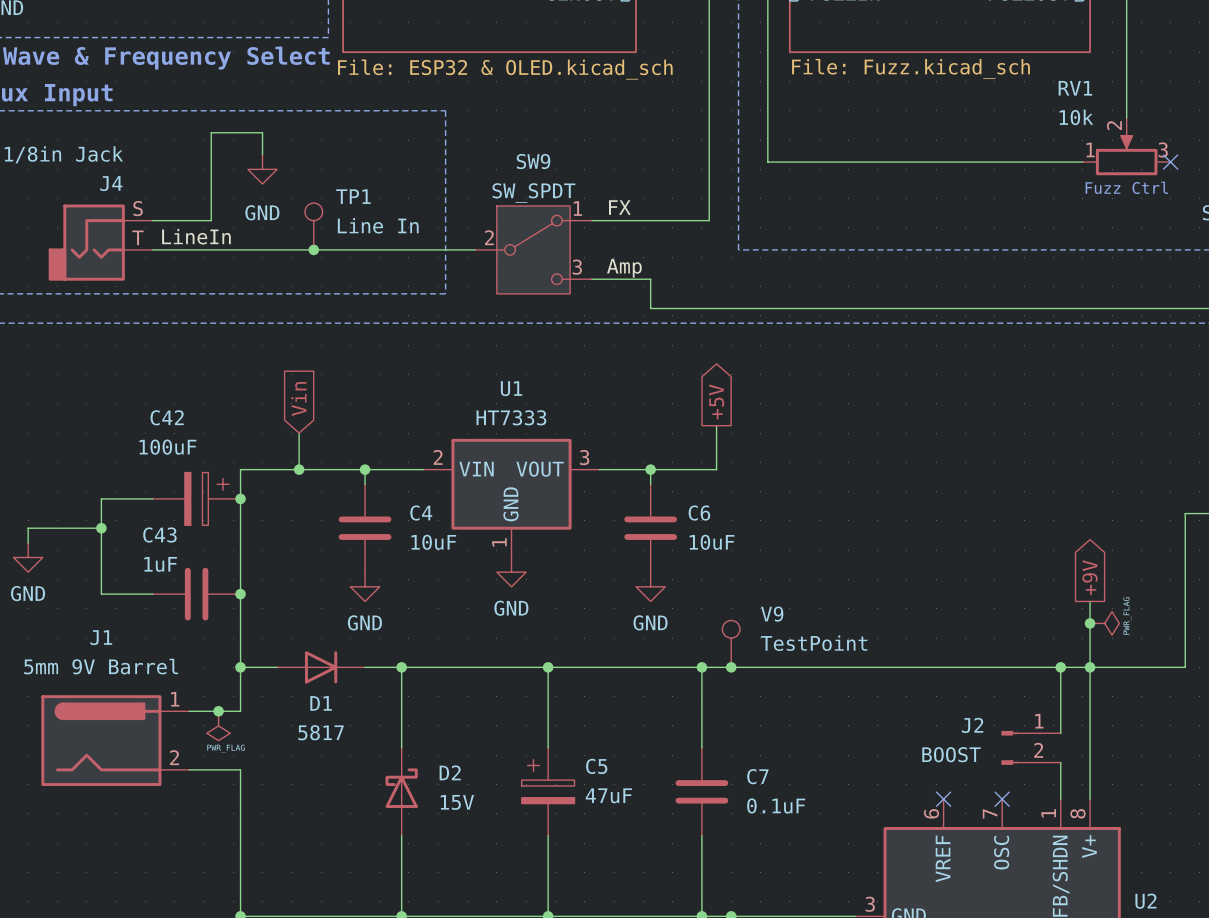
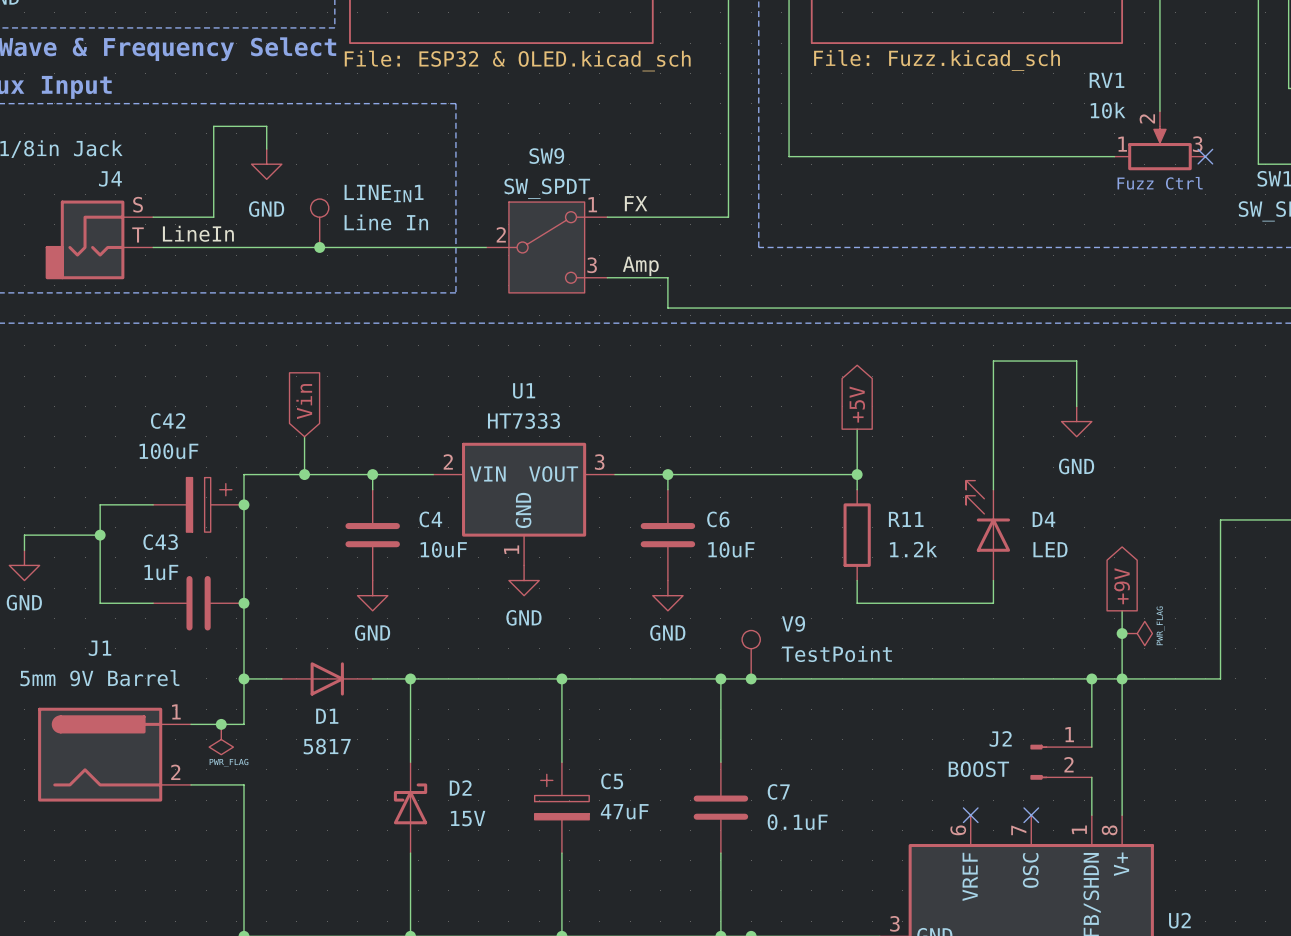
TP1 name: TP1 (353, 196) -> LINEIN1 (384, 193)
global label position: +5V (716, 401) -> +5V (857, 404)
wire: none -> (1076, 406) (1076, 361) (993, 361) (993, 489)
power symbol: none -> GND (1076, 421)
wire: (716, 425) (716, 469) -> (857, 474) (736, 474)
wire: none -> (857, 429) (857, 489)
junction: none -> (857, 474)
D4: none -> LED (988, 530)
R11: none -> 1.2k (857, 535)
wire: none -> (857, 580) (857, 603) (993, 603) (993, 580)

